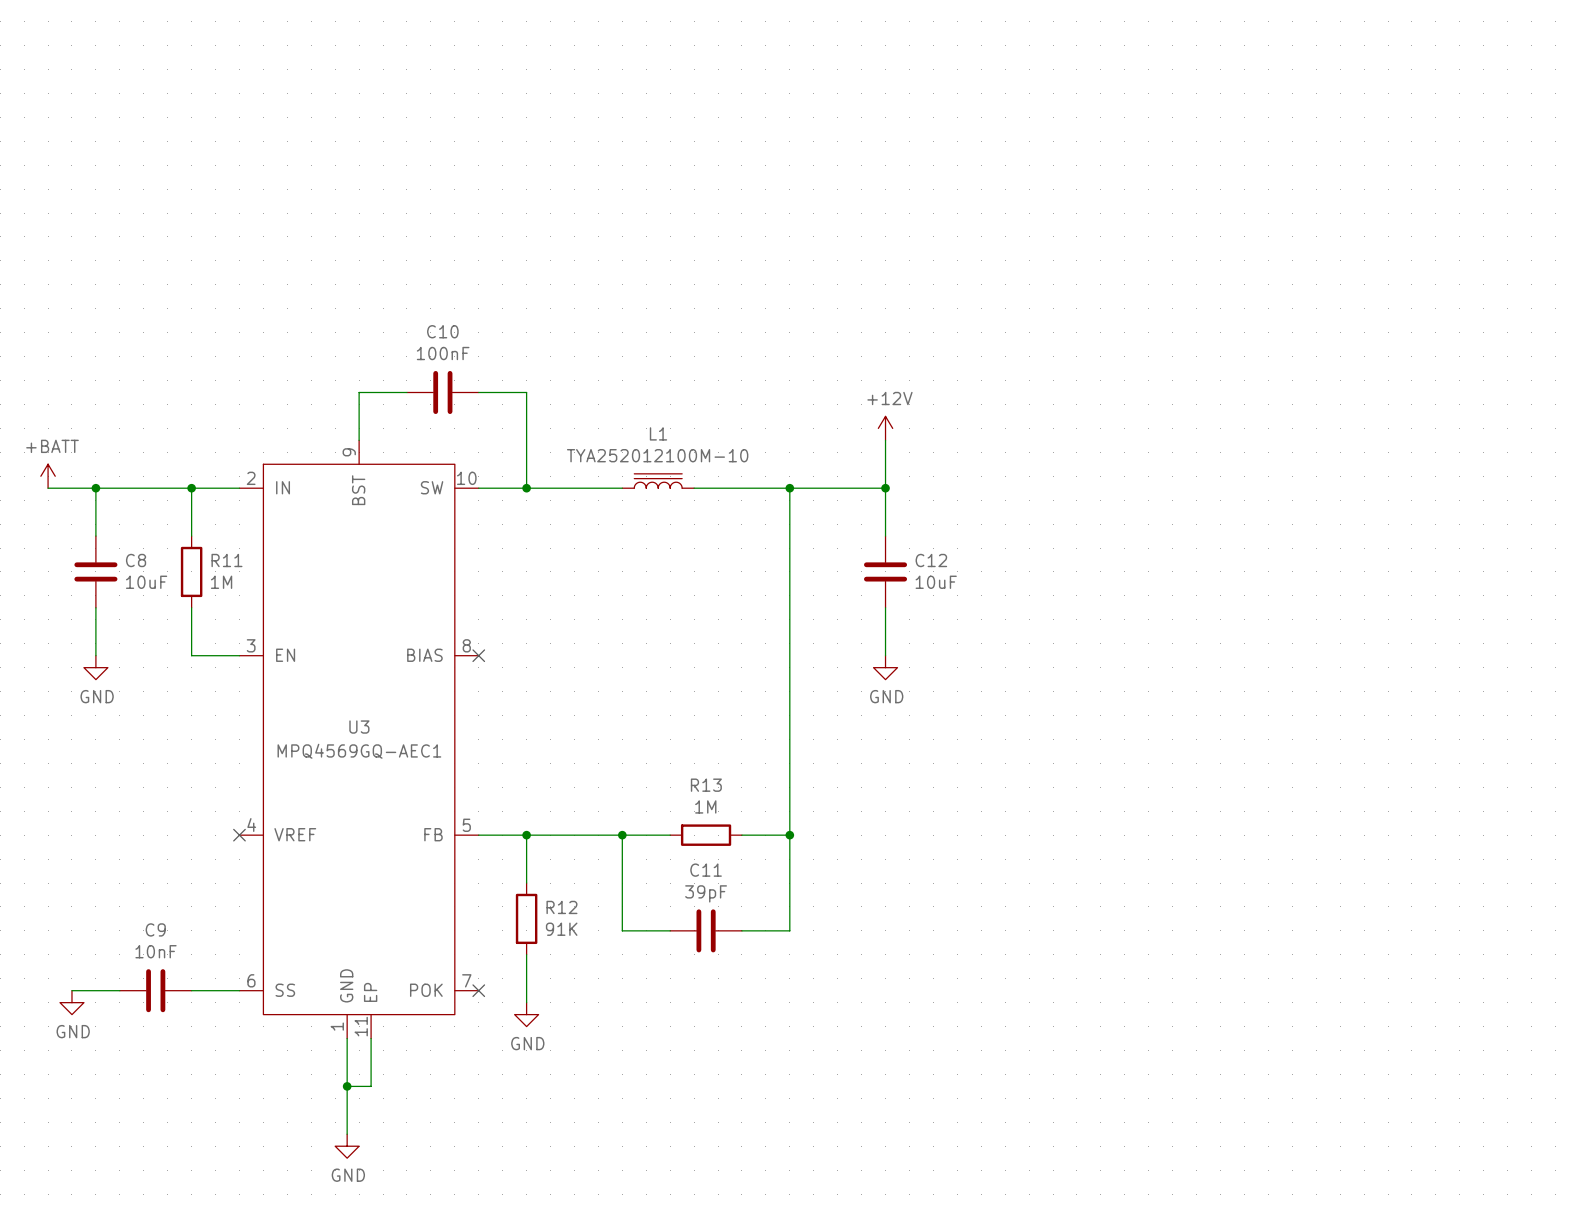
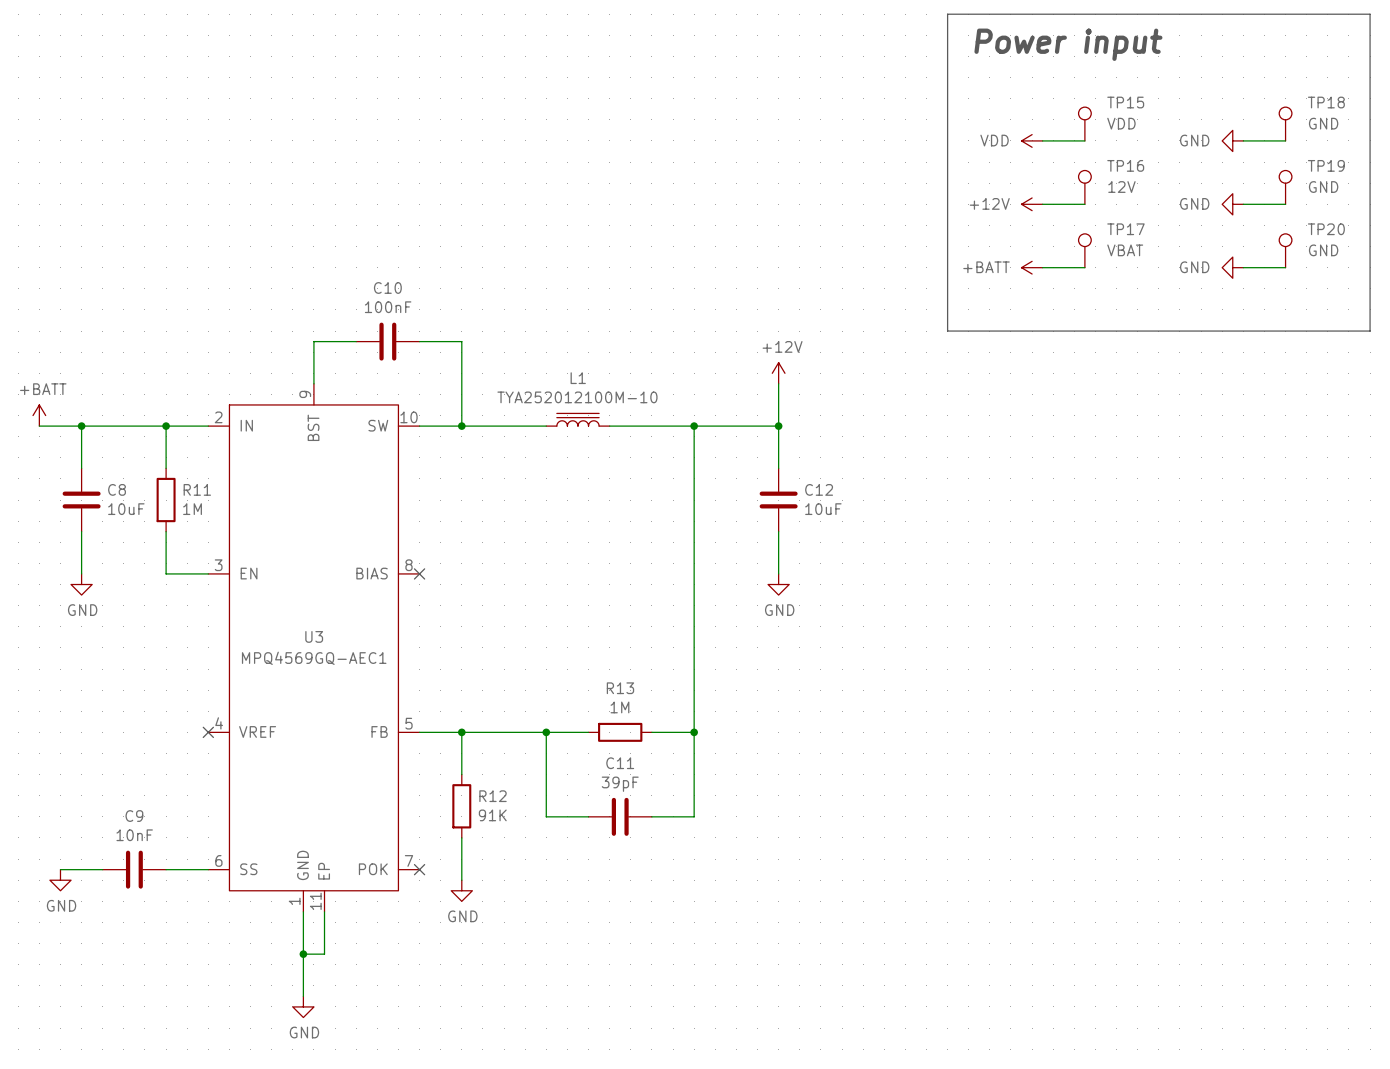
line: none -> (947, 14) (947, 331) (1370, 331) (1370, 14) (947, 14)
text: none -> Power input (1068, 44)
TP15: none -> VDD (1084, 124)
TP18: none -> GND (1285, 124)
power symbol: none -> VDD (1032, 140)
wire: none -> (1042, 140) (1084, 140)
power symbol: none -> GND (1232, 140)
wire: none -> (1243, 140) (1285, 140)
TP16: none -> 12V (1084, 187)
TP19: none -> GND (1285, 187)
power symbol: none -> +12V (1032, 204)
wire: none -> (1042, 204) (1084, 204)
power symbol: none -> GND (1232, 204)
wire: none -> (1243, 204) (1285, 204)
TP17: none -> VBAT (1084, 250)
TP20: none -> GND (1285, 250)
power symbol: none -> +BATT (1032, 267)
wire: none -> (1042, 267) (1084, 267)
power symbol: none -> GND (1232, 267)
wire: none -> (1243, 267) (1285, 267)

